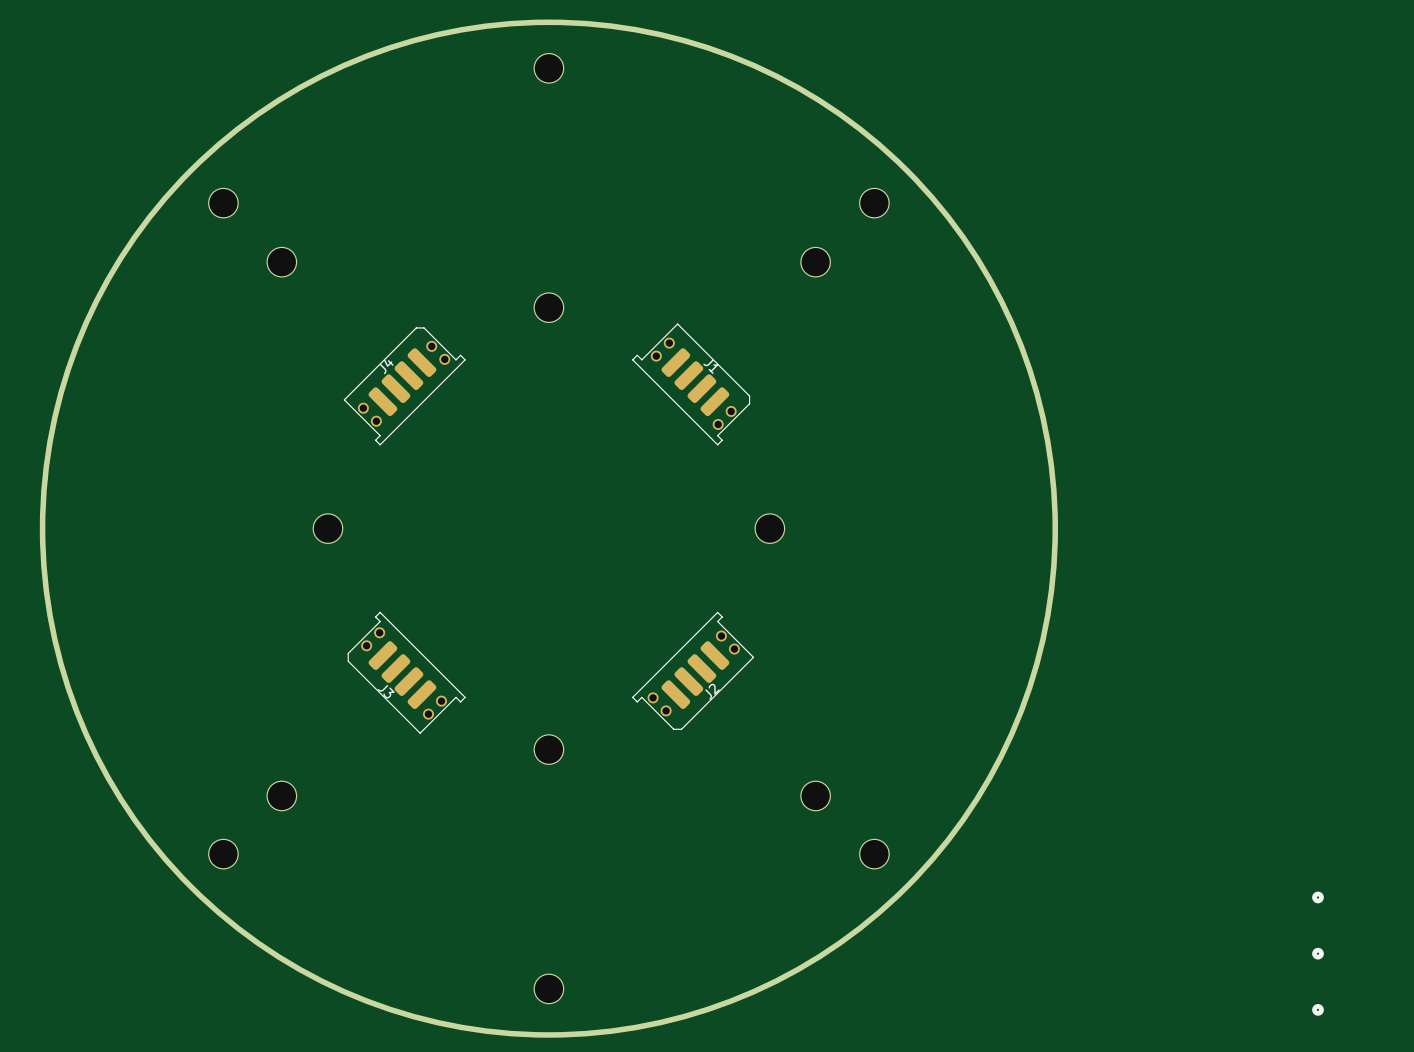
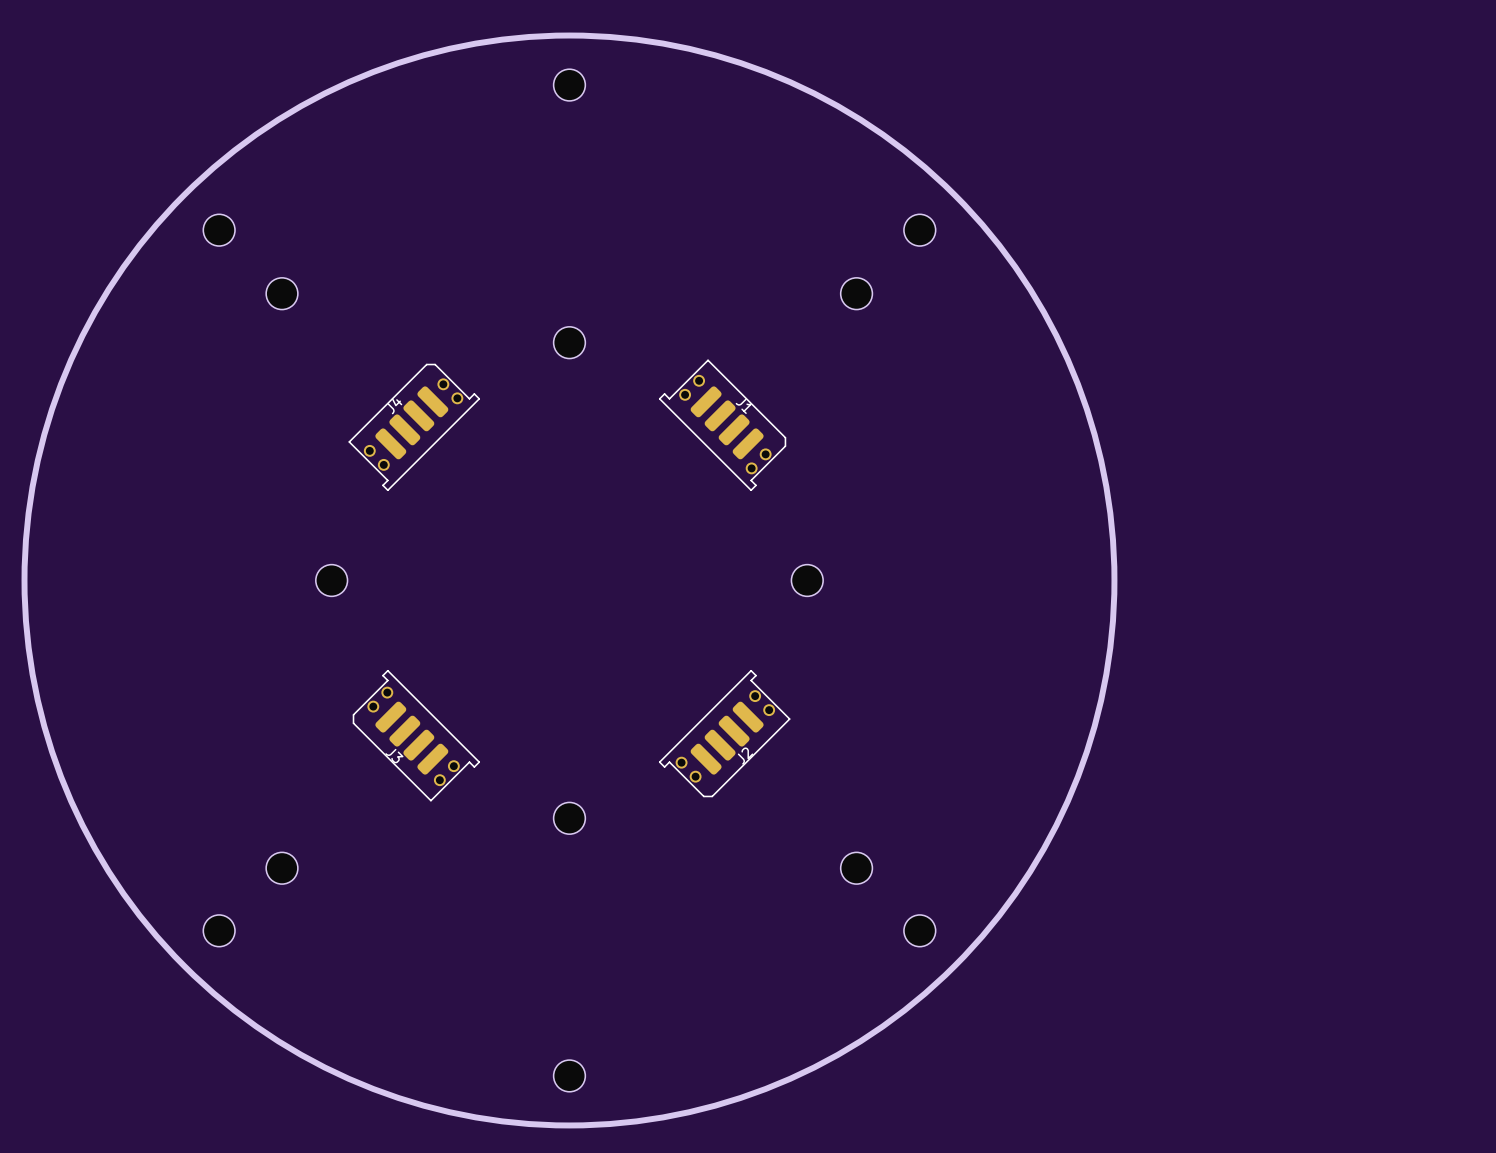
part: (1317, 897) -> none
part: (1317, 953) -> none
part: (1317, 1009) -> none

